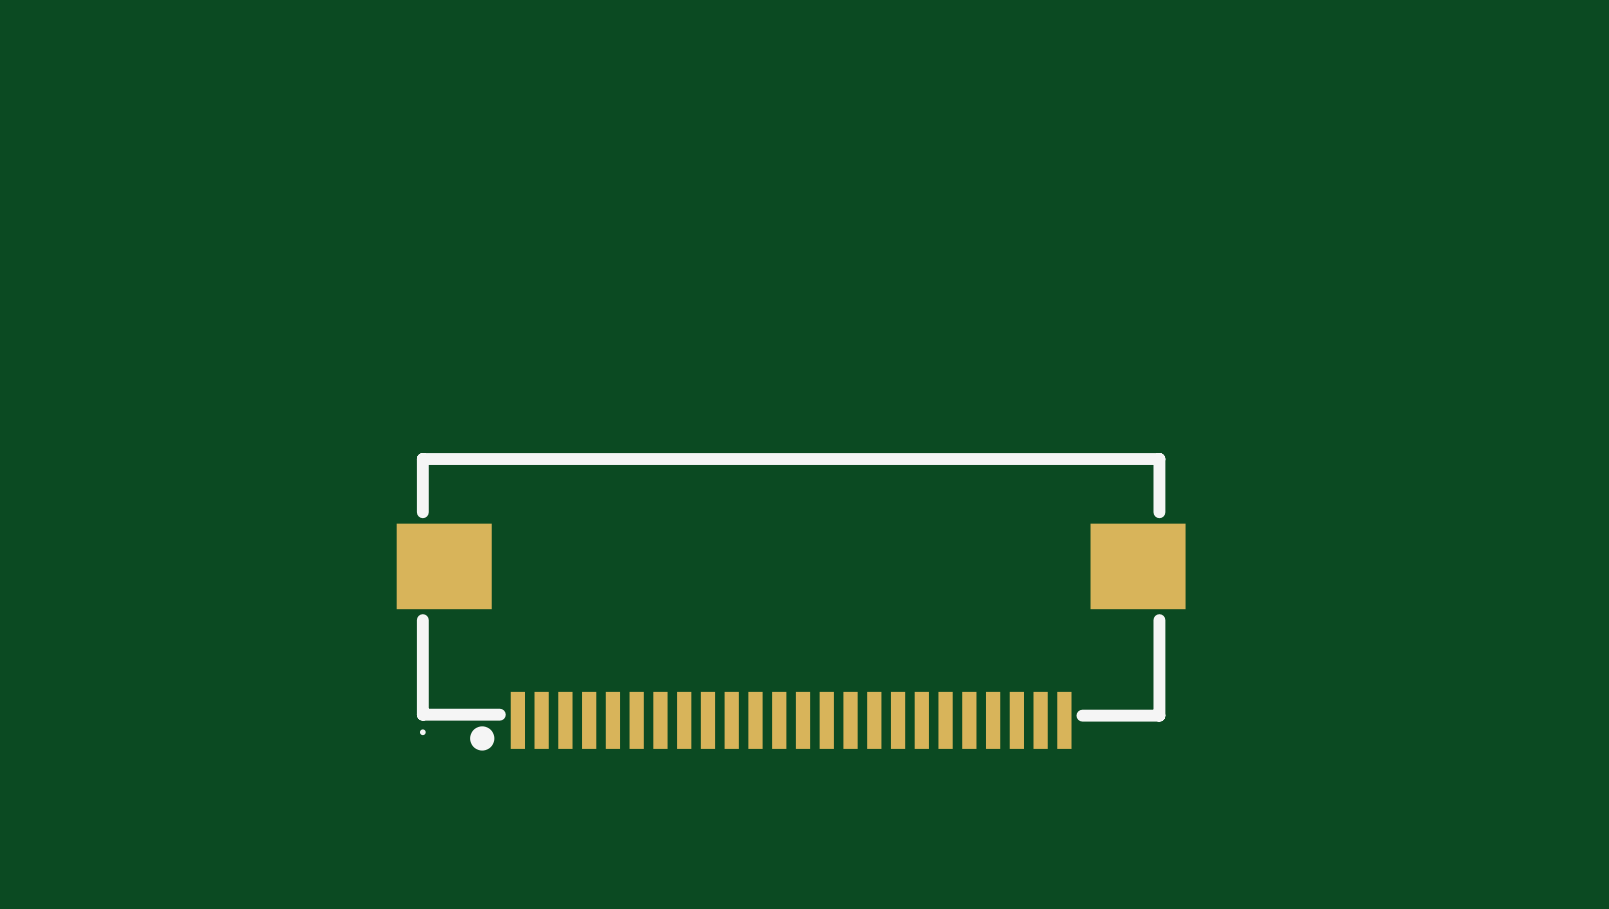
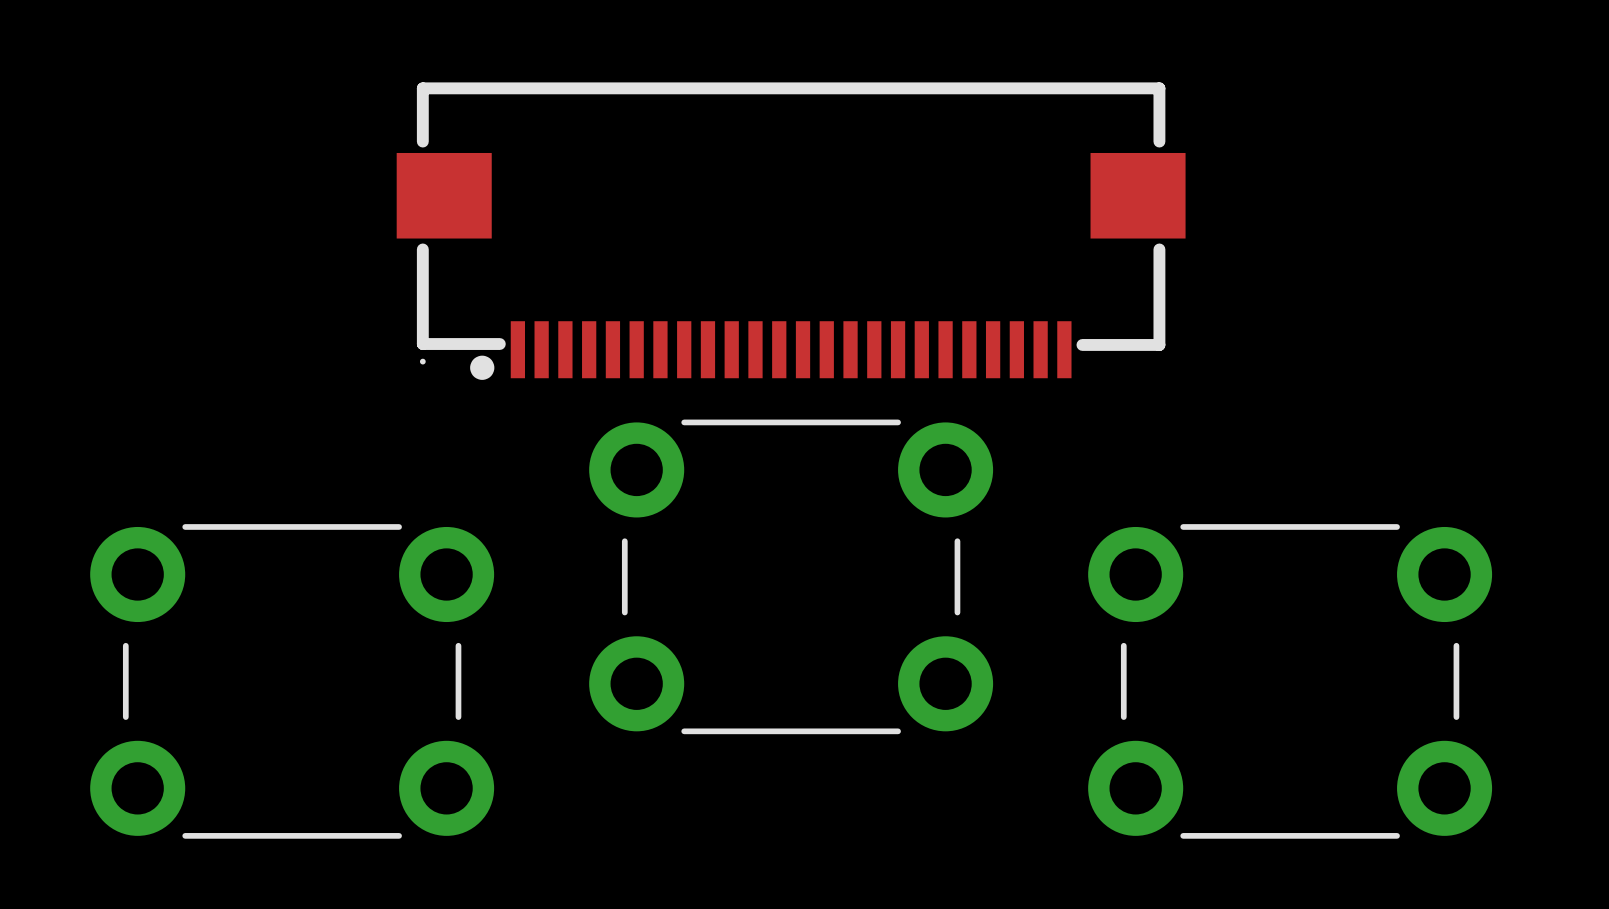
part: none -> (791, 231)
part footprint: [396, 453, 1186, 751] -> [589, 419, 994, 735]
part: none -> (292, 681)
part: none -> (1290, 681)

